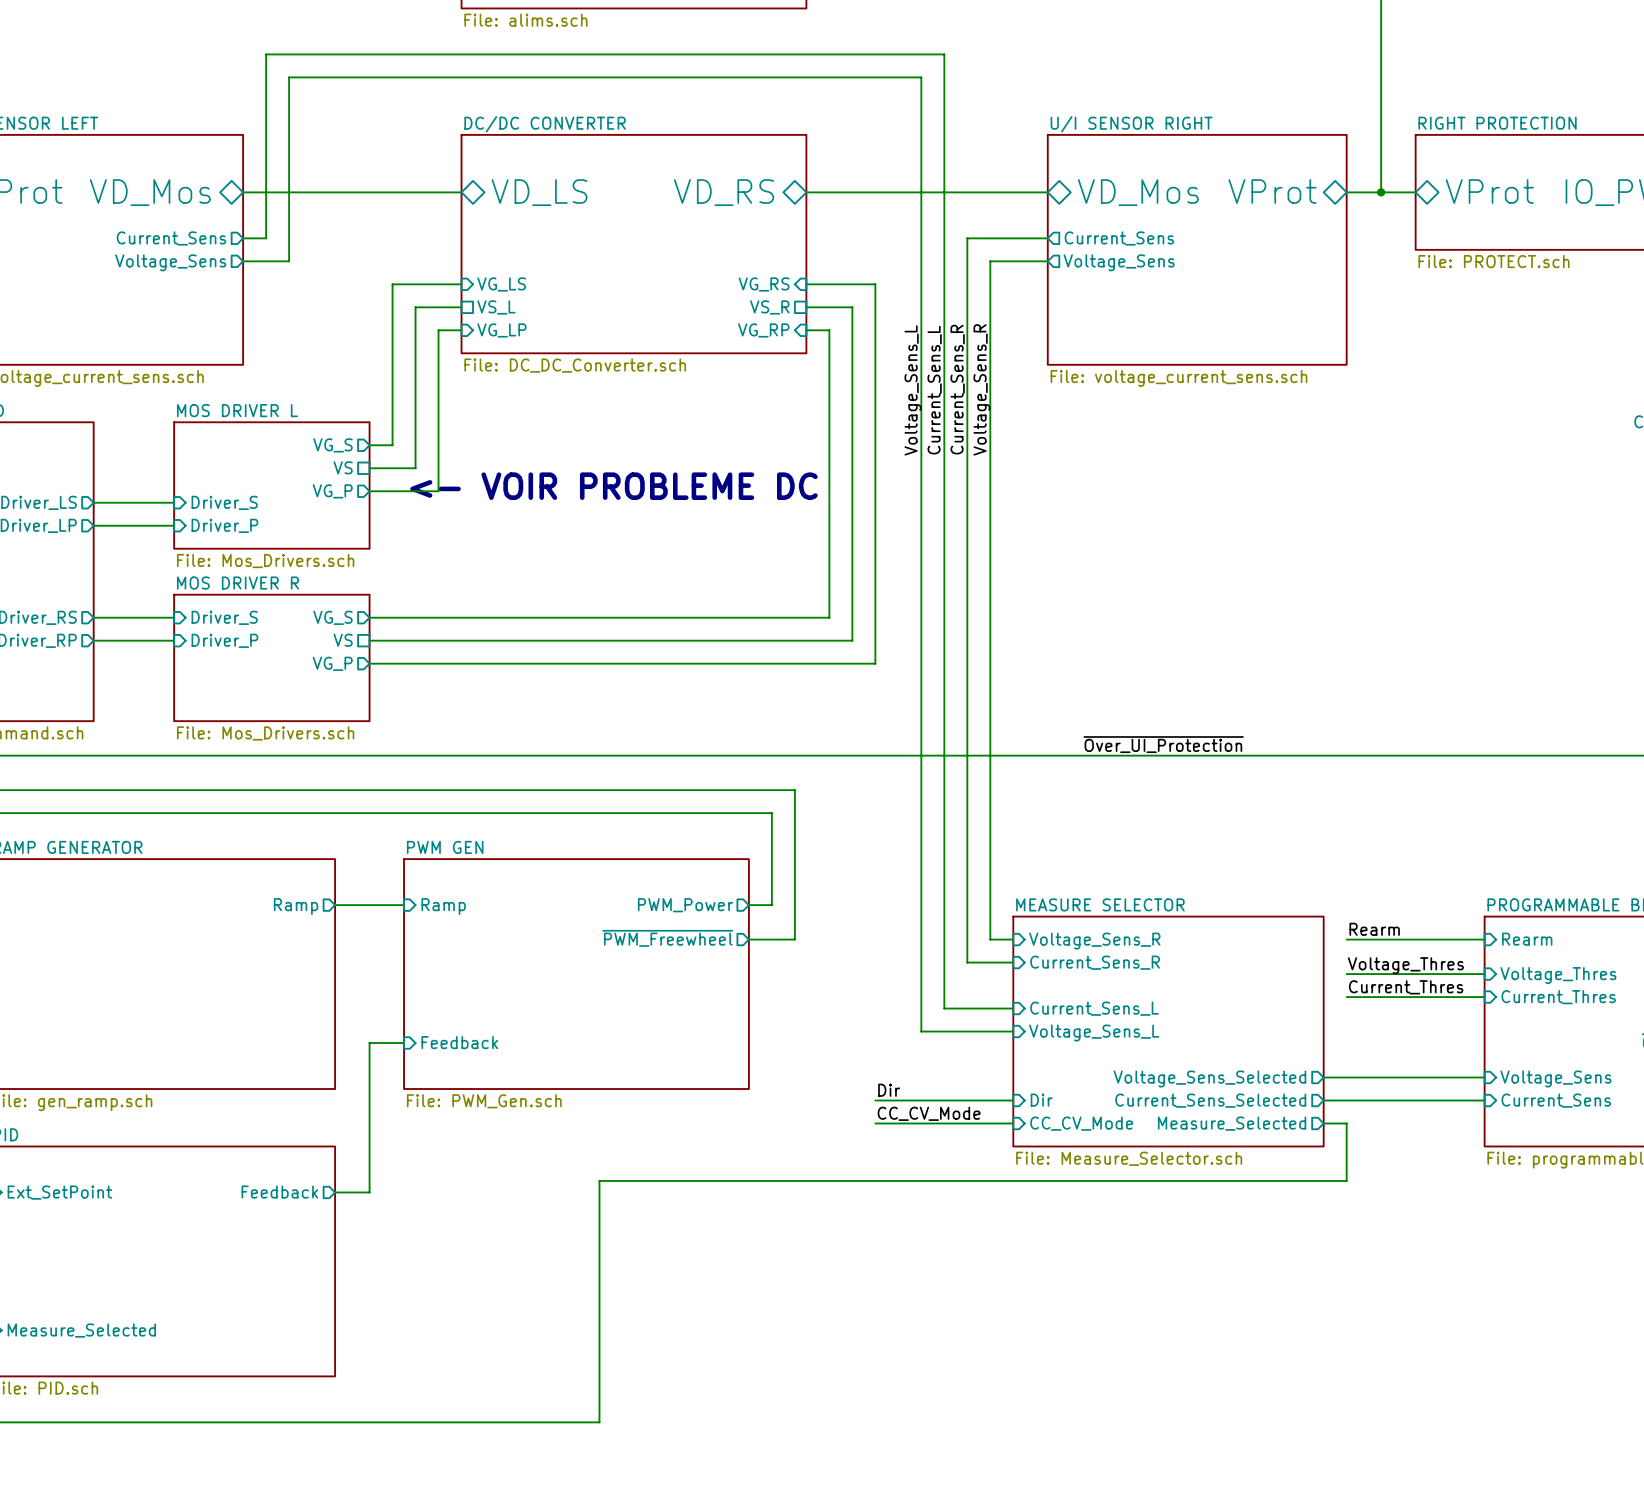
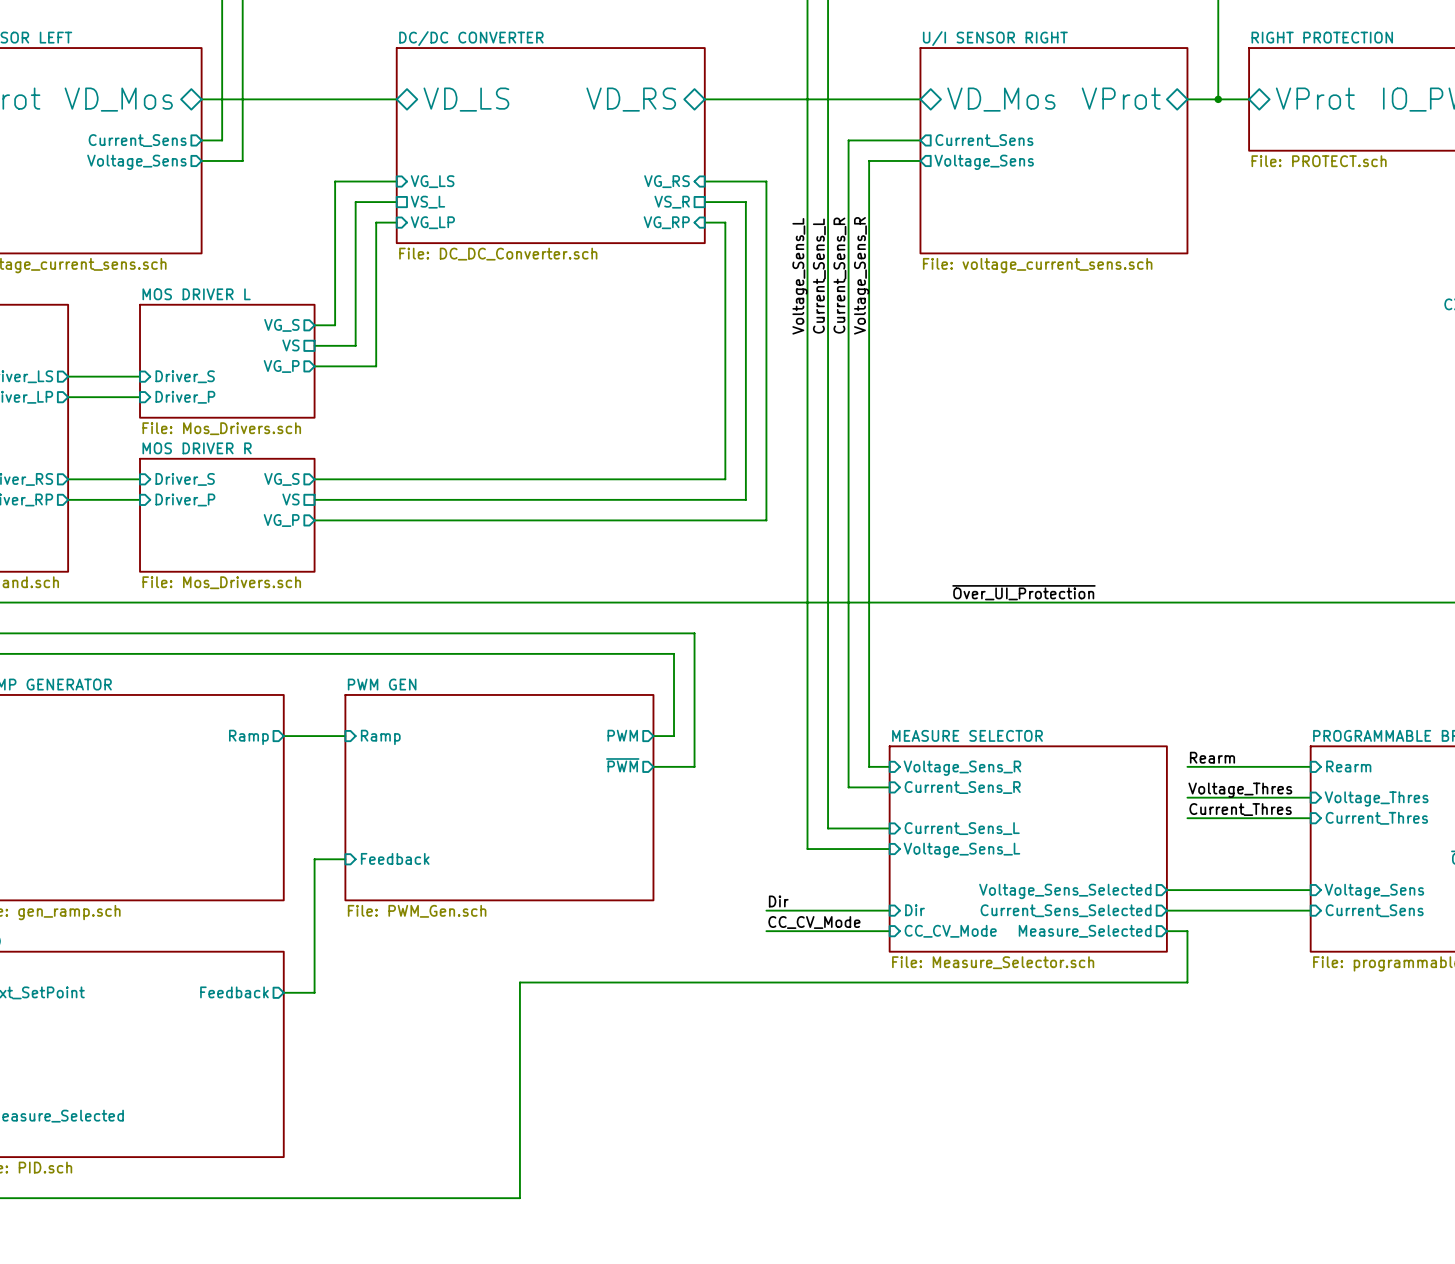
text: <- VOIR PROBLEME DC (613, 486) -> none
sheet pin: PWM_Power (685, 905) -> PWM (622, 735)
sheet pin: ~{PWM_Freewheel} (667, 938) -> ~{PWM} (622, 765)

